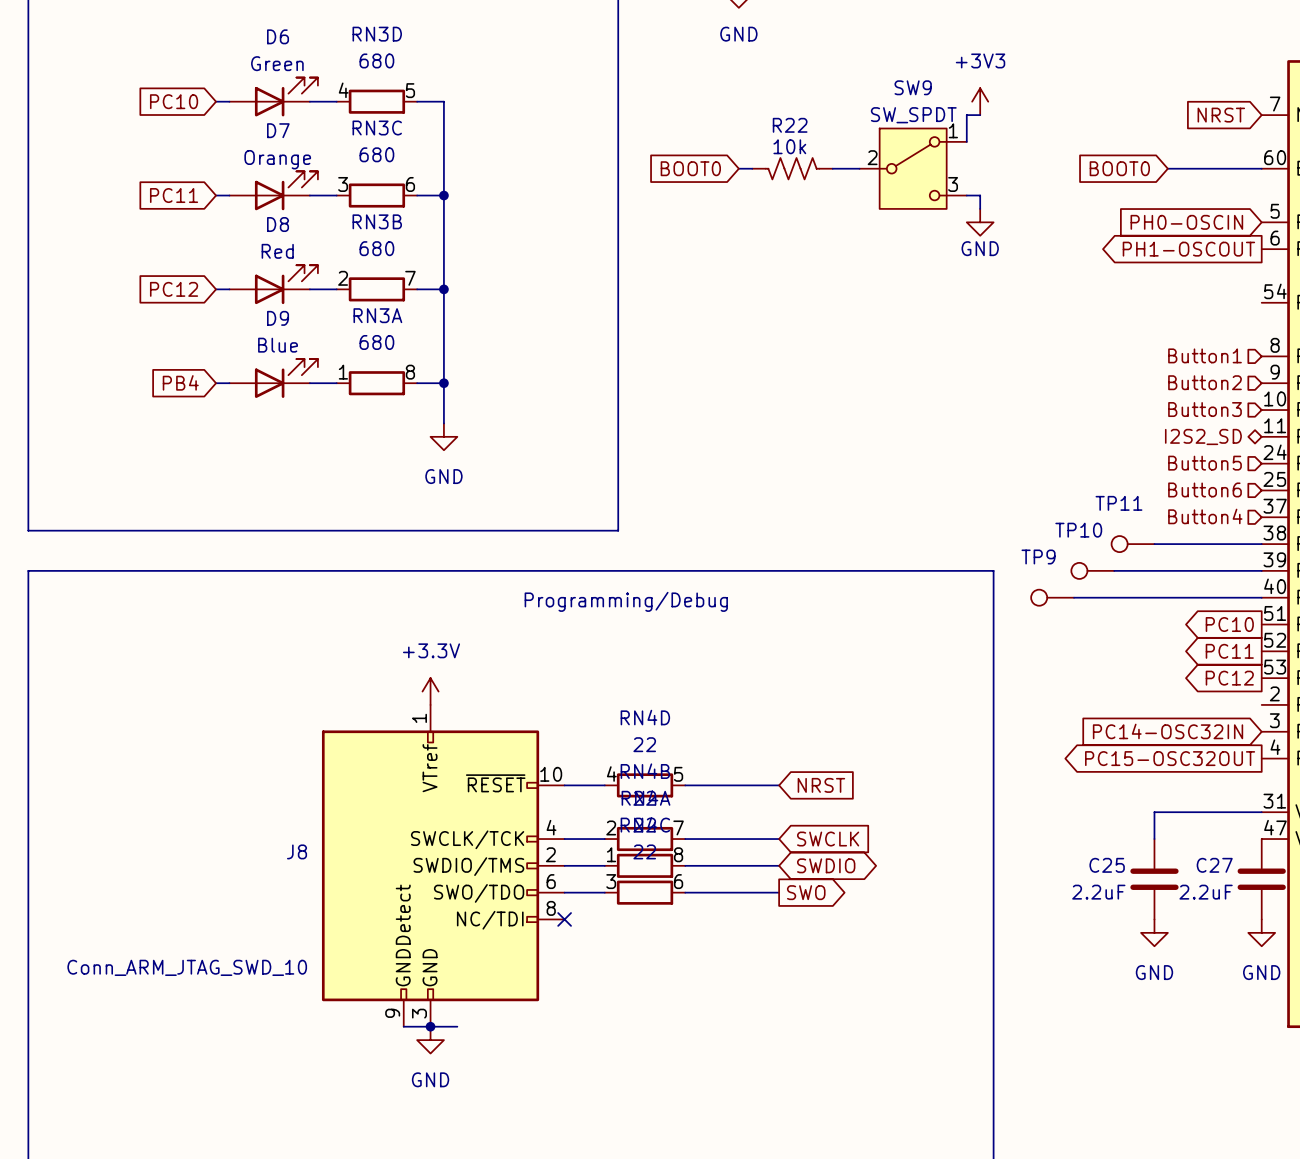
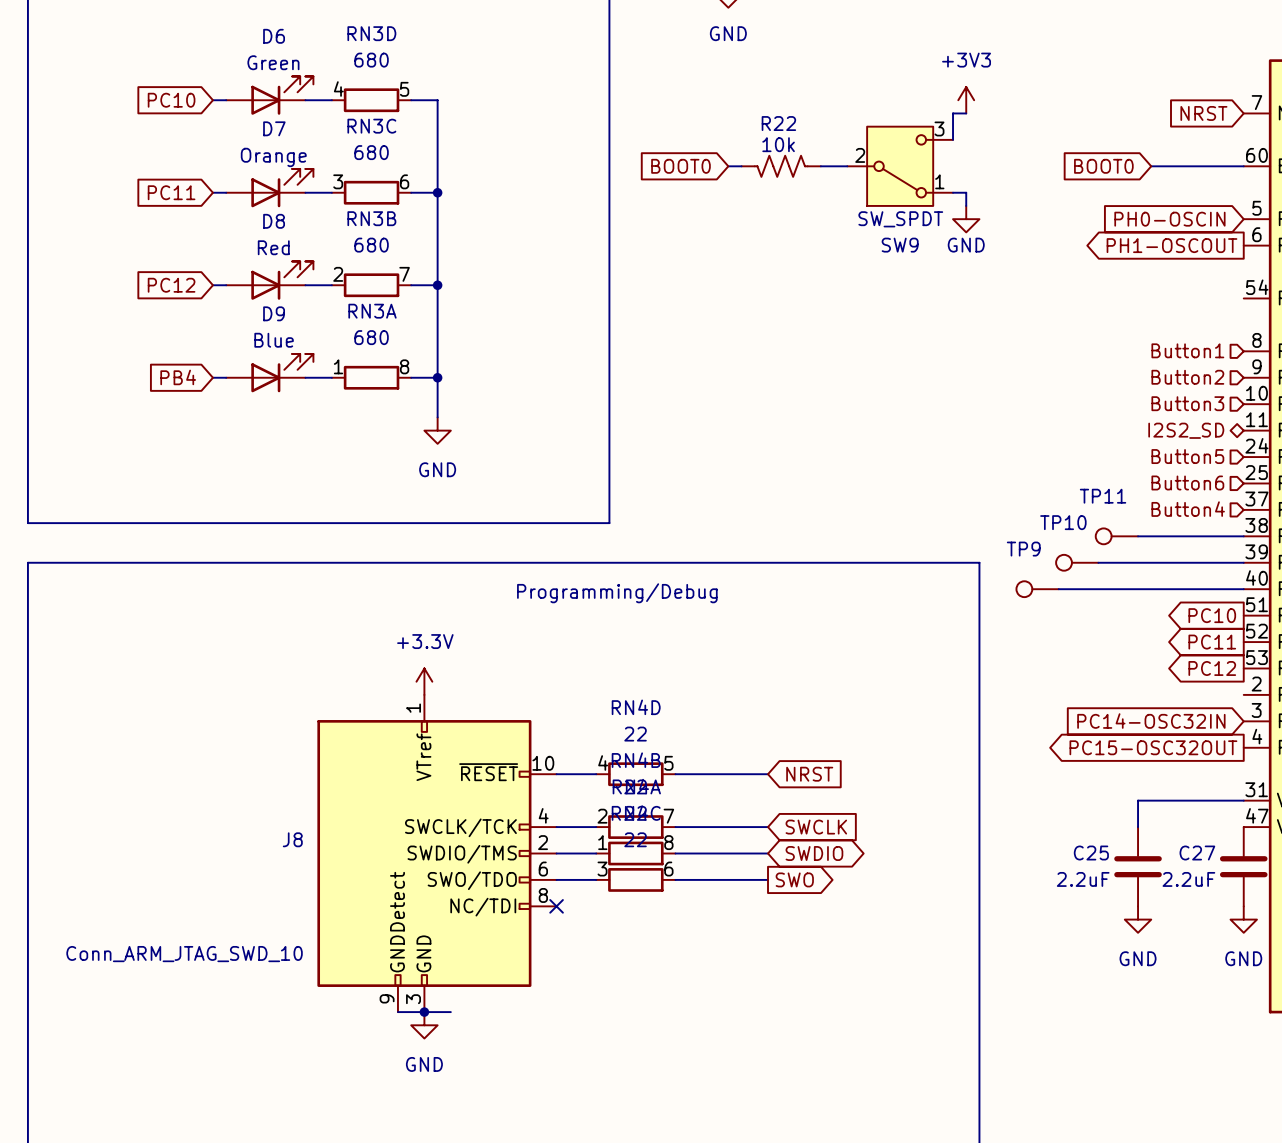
SW9 flip: as is (913, 168) -> up-down (900, 166)

